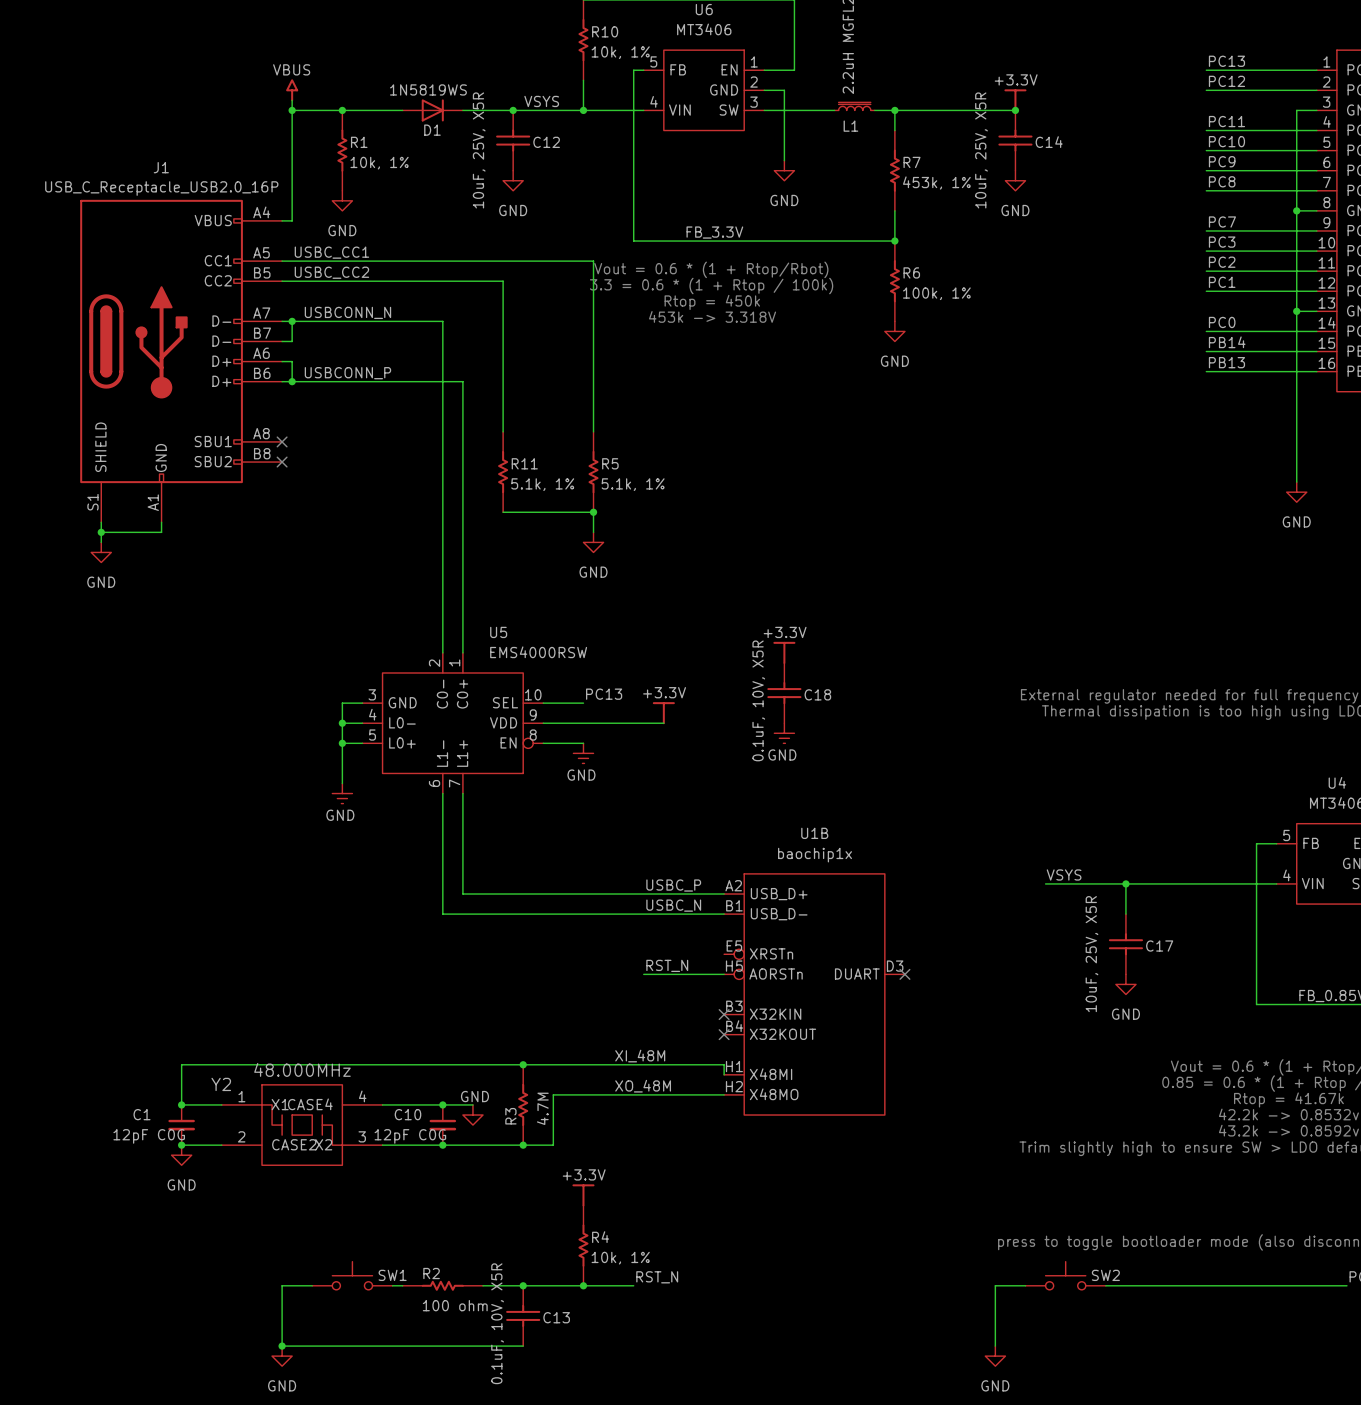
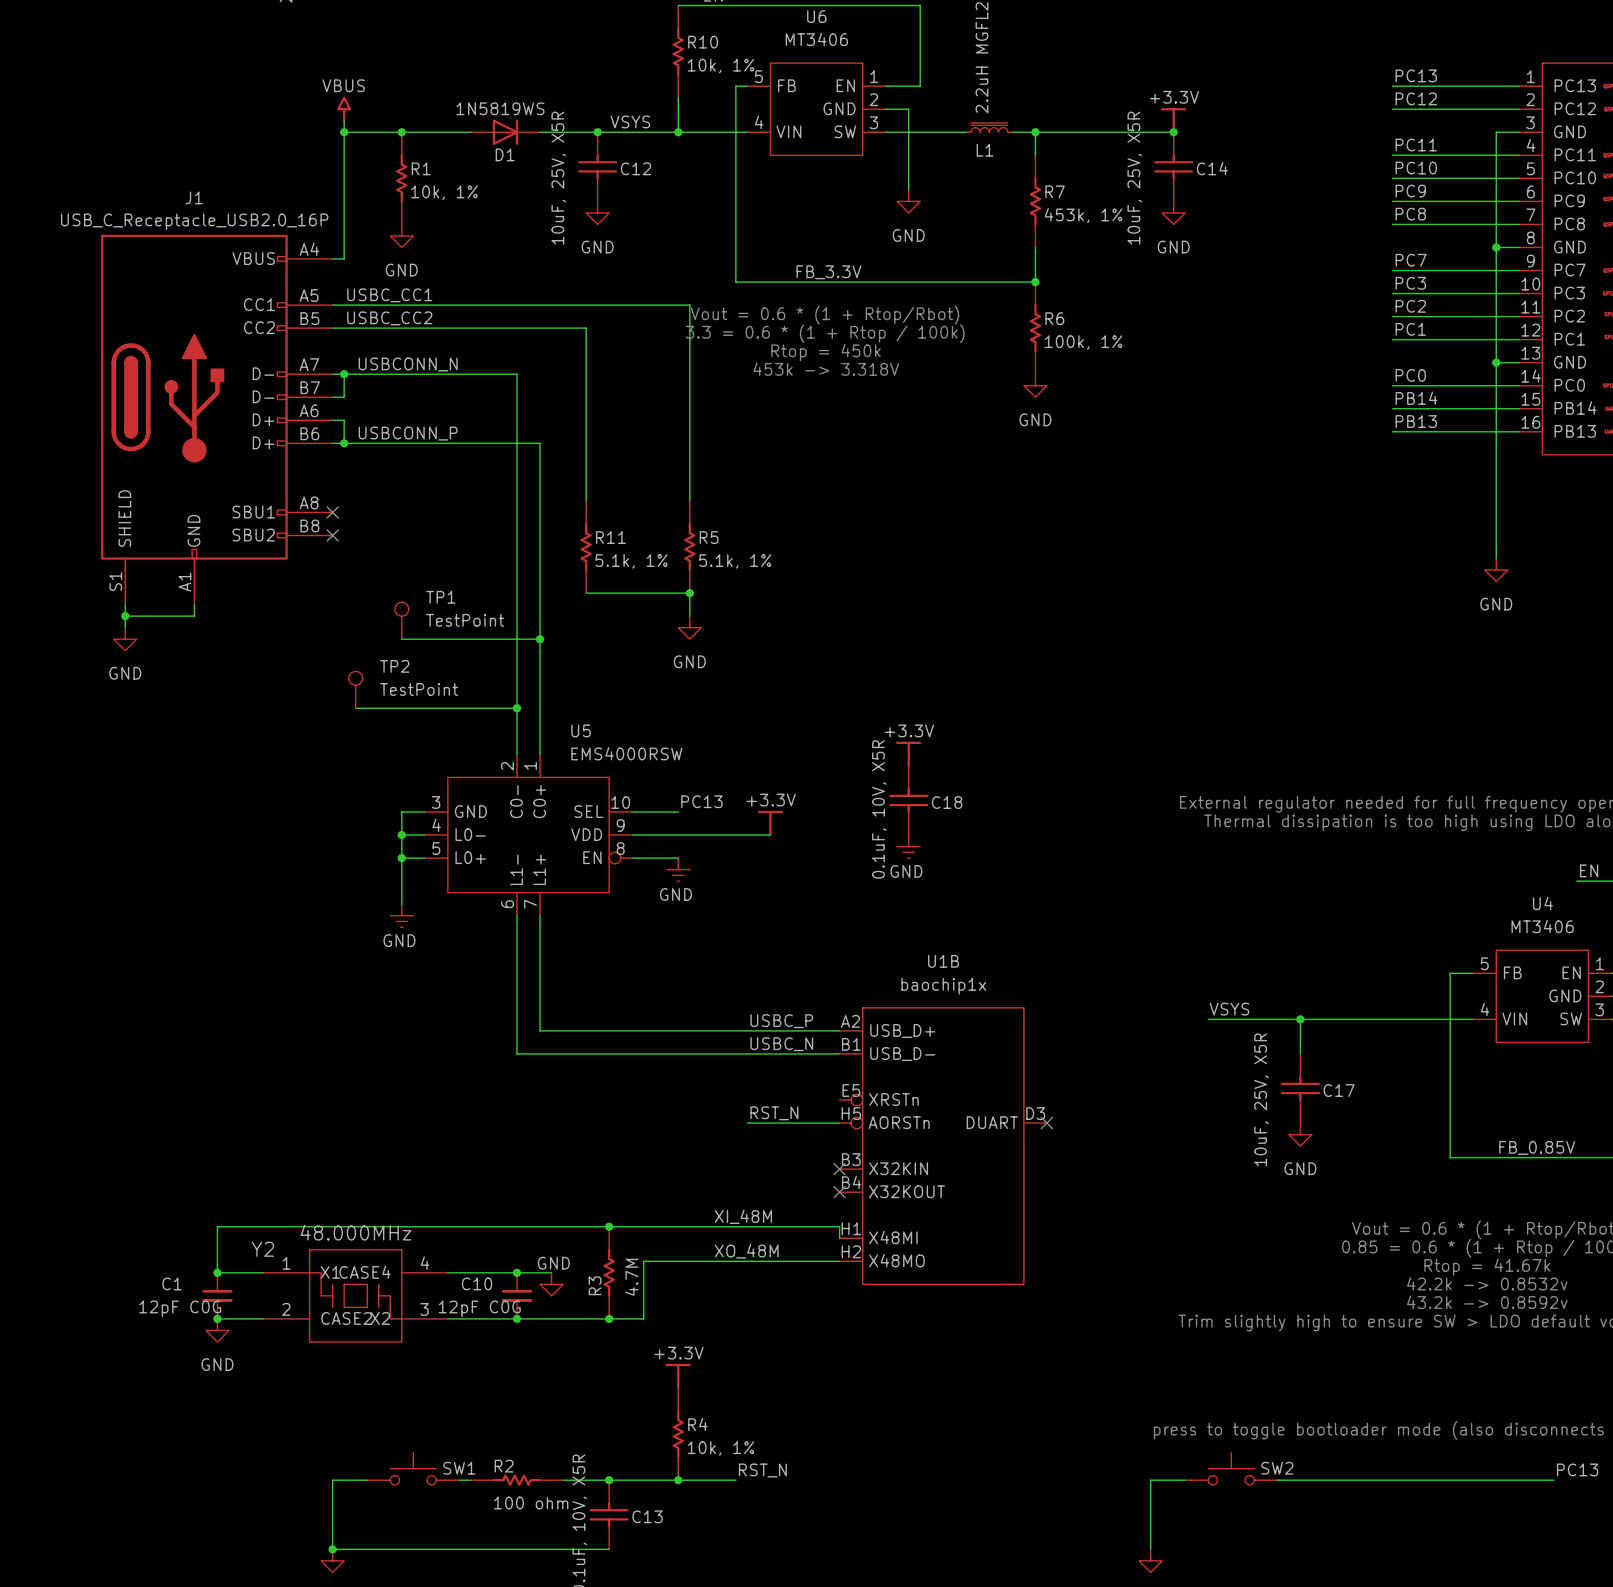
TP1: none -> TestPoint (401, 620)
wire: none -> (401, 639) (540, 639)
junction: none -> (540, 639)
TP2: none -> TestPoint (355, 689)
wire: none -> (355, 708) (516, 708)
junction: none -> (516, 708)

